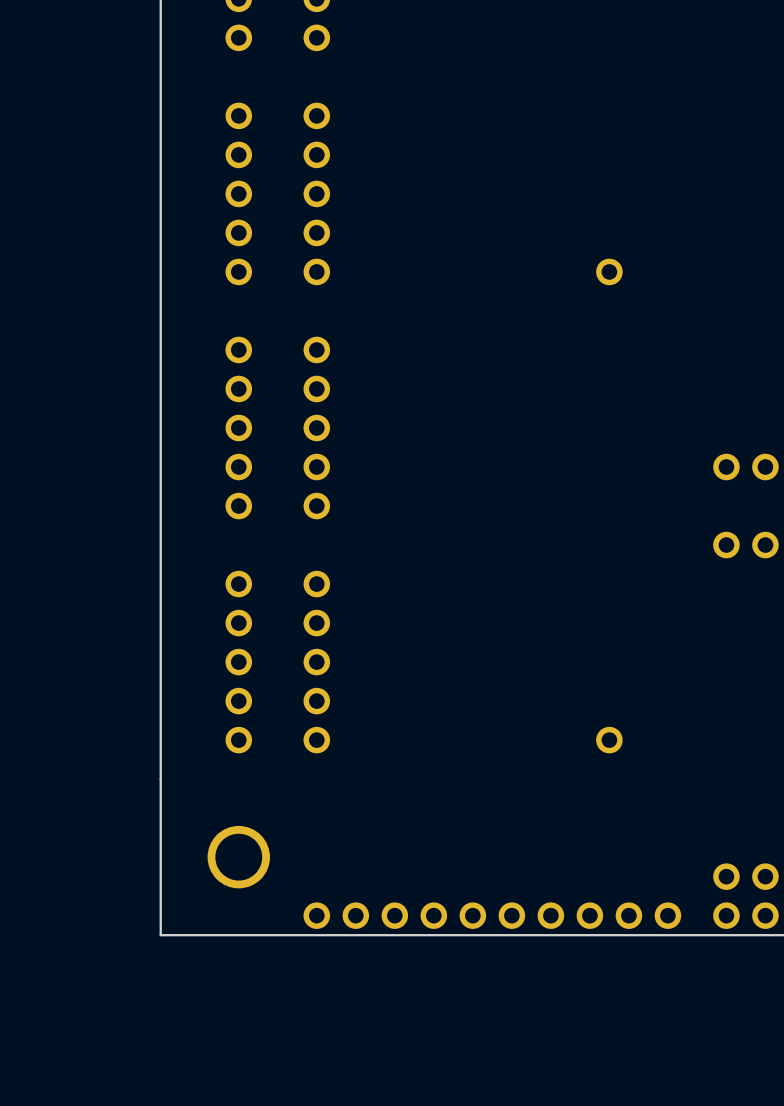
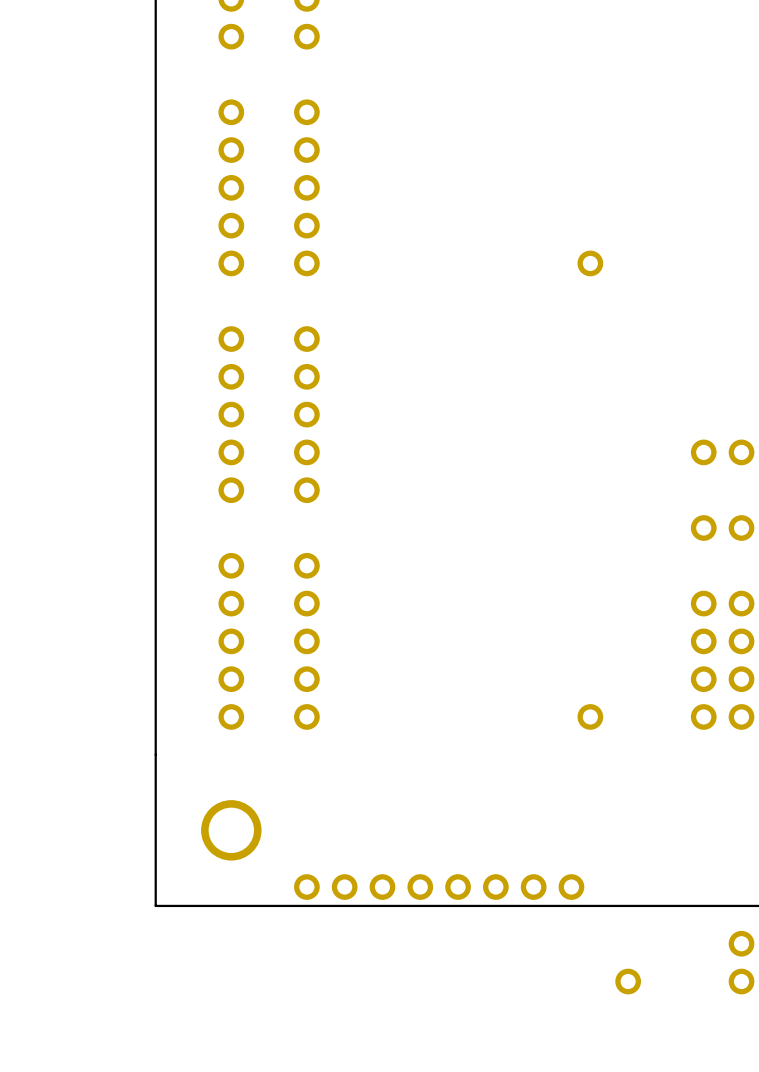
part: none -> (722, 603)
part: none -> (722, 641)
part: none -> (722, 679)
part: none -> (722, 716)
part: (726, 896) -> none
part: (765, 896) -> none
part: (628, 915) -> none
part: (667, 915) -> none
part: none -> (741, 943)
part: none -> (628, 981)
part: none -> (741, 981)

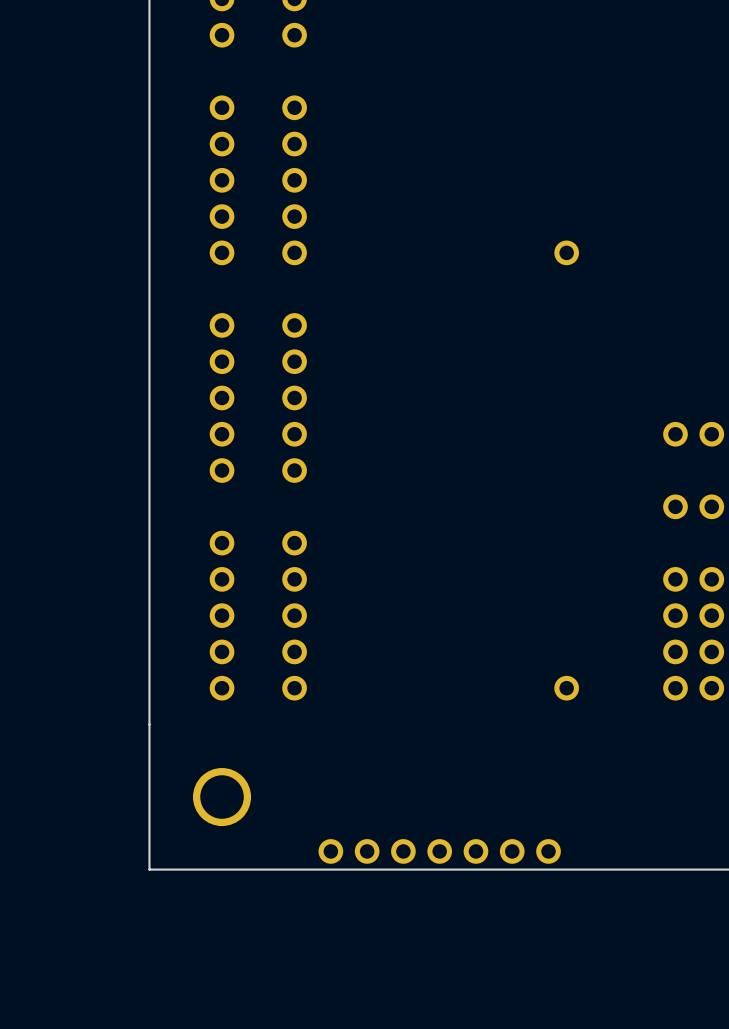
part: (306, 887) -> none
part: (741, 943) -> none
part: (628, 981) -> none
part: (741, 981) -> none

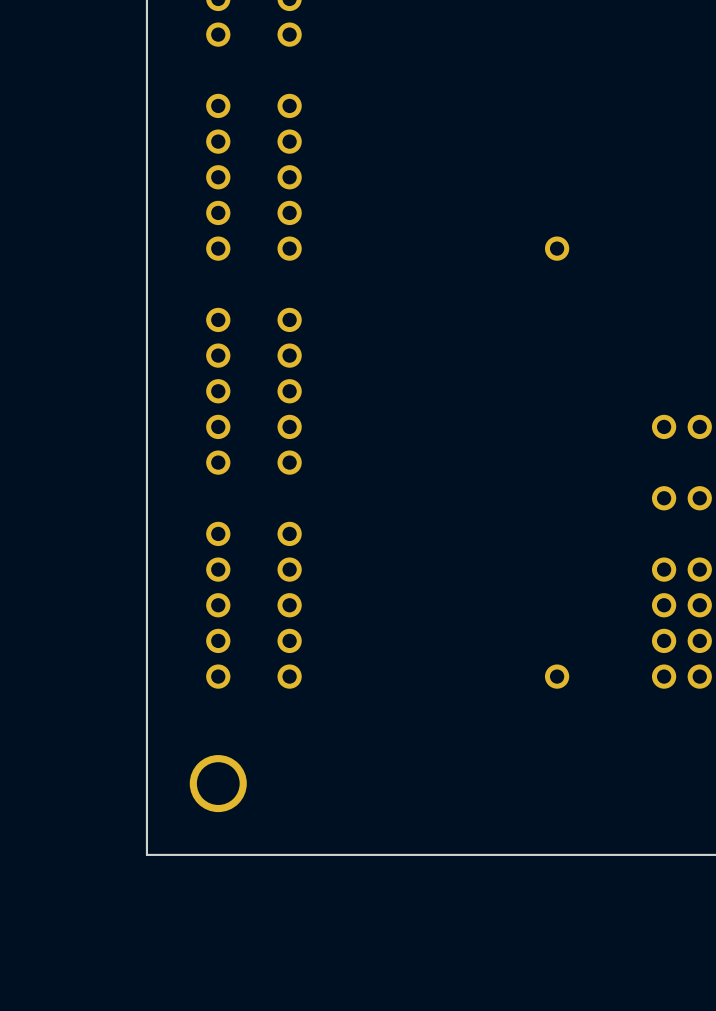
part: (330, 851) -> none
part: (367, 851) -> none
part: (403, 851) -> none
part: (439, 851) -> none
part: (475, 851) -> none
part: (512, 851) -> none
part: (548, 851) -> none

